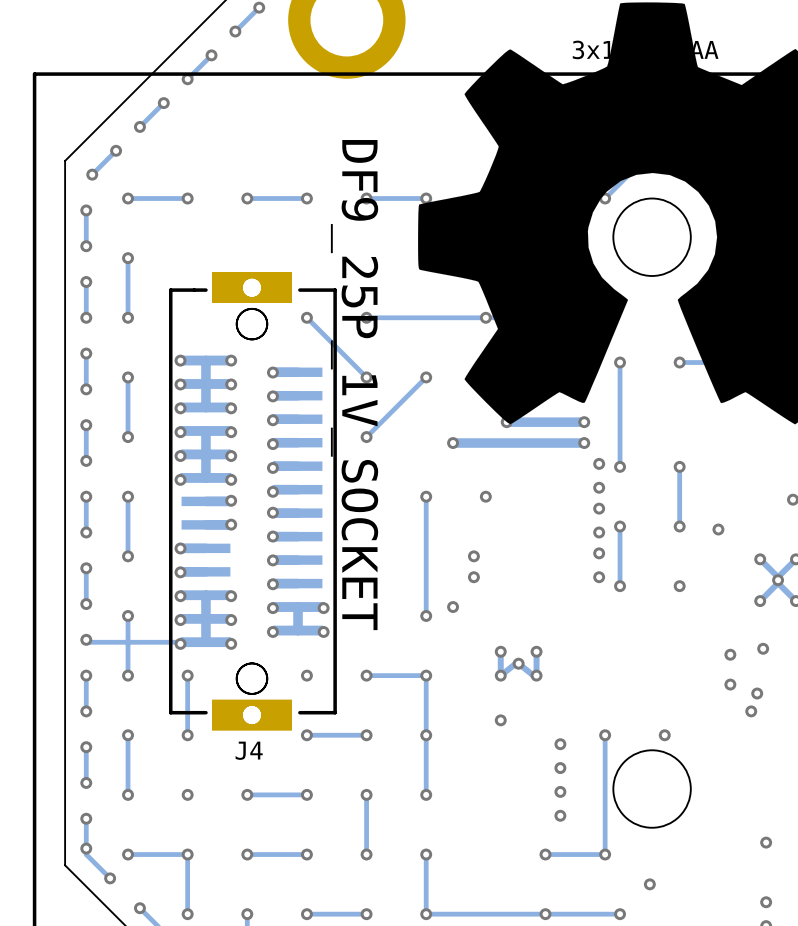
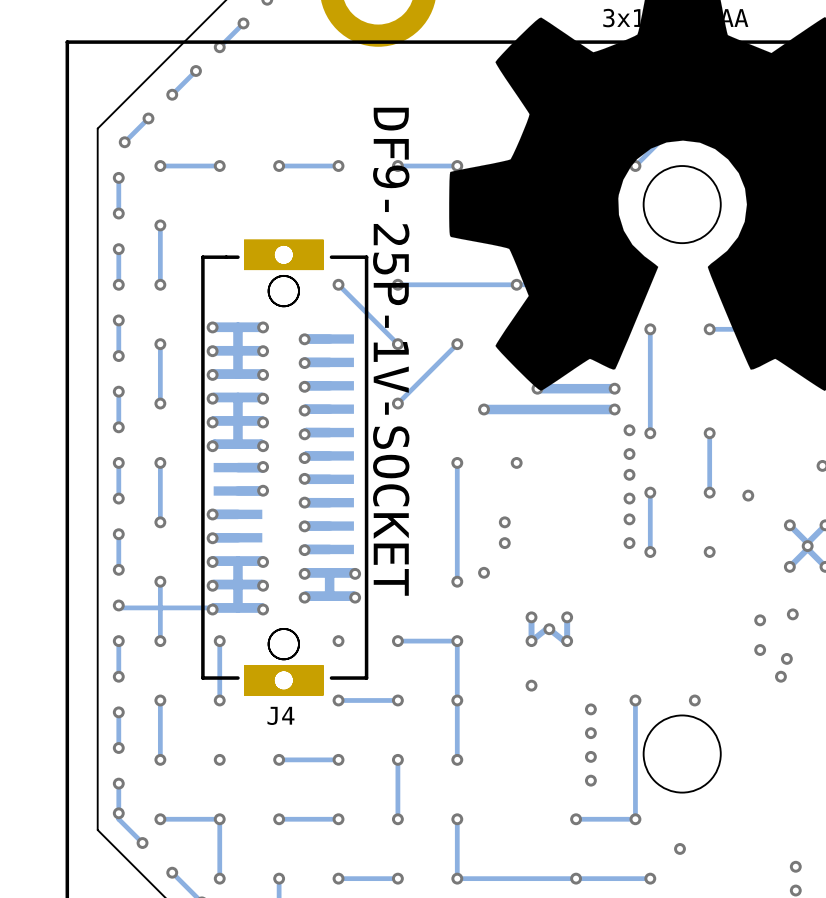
J4 value: DF9_25P_1V_SOCKET (354, 385) -> DF9-25P-1V-SOCKET (391, 351)
via: (766, 842) -> none

